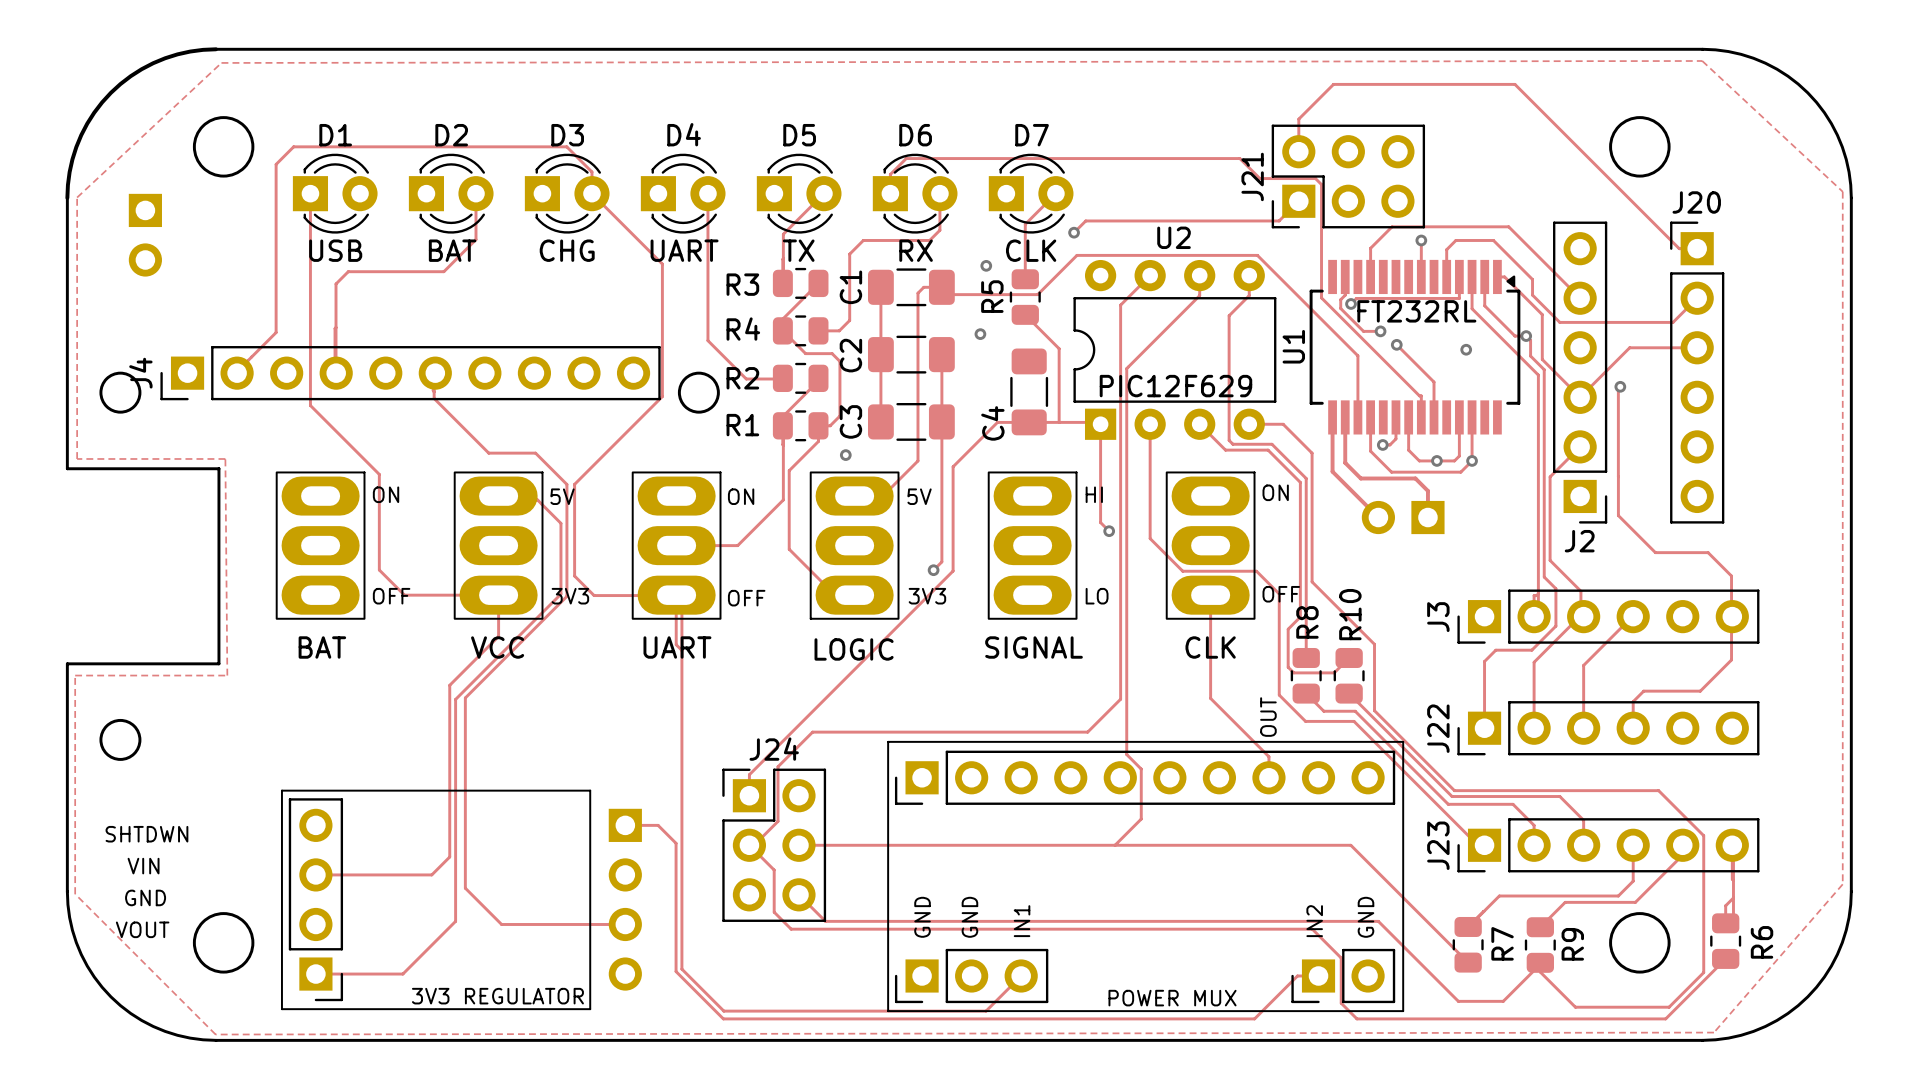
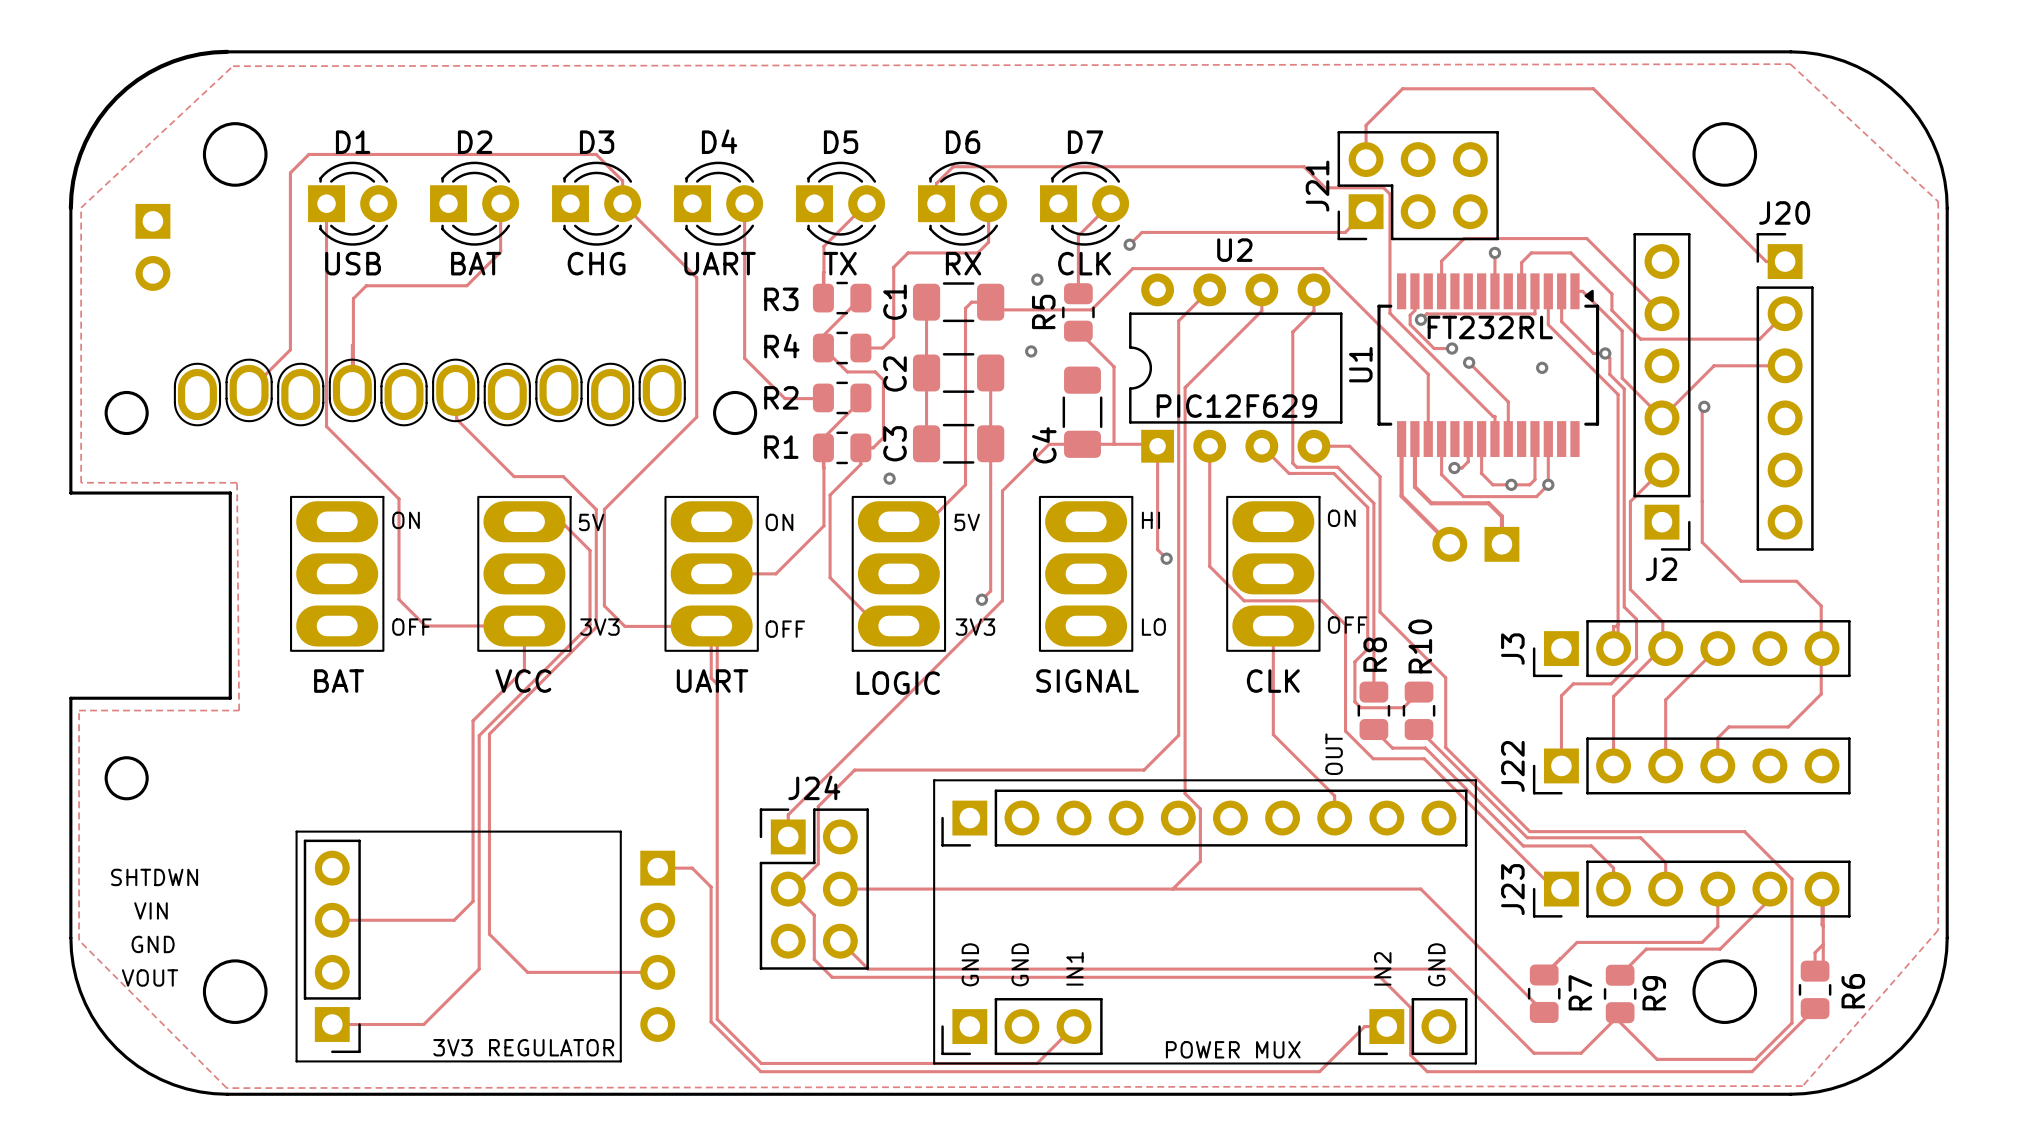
part: none -> (249, 390)
part: none -> (352, 390)
part: none -> (455, 390)
part: none -> (558, 390)
part: none -> (662, 390)
J4: (410, 373) -> none
part: none -> (197, 394)
part: none -> (300, 394)
part: none -> (404, 394)
part: none -> (507, 394)
part: none -> (610, 394)

